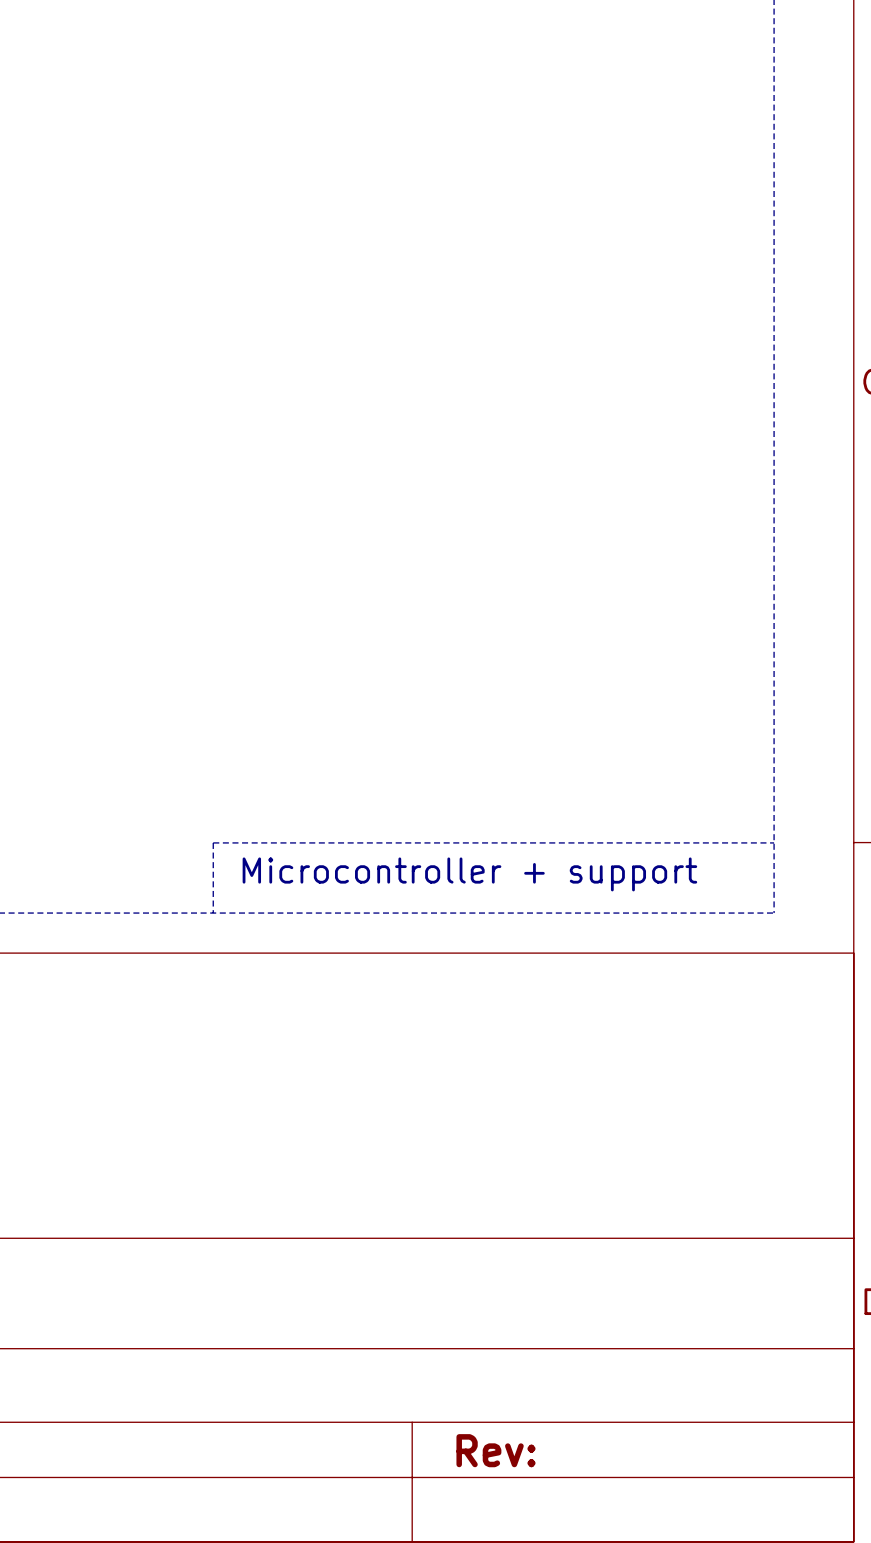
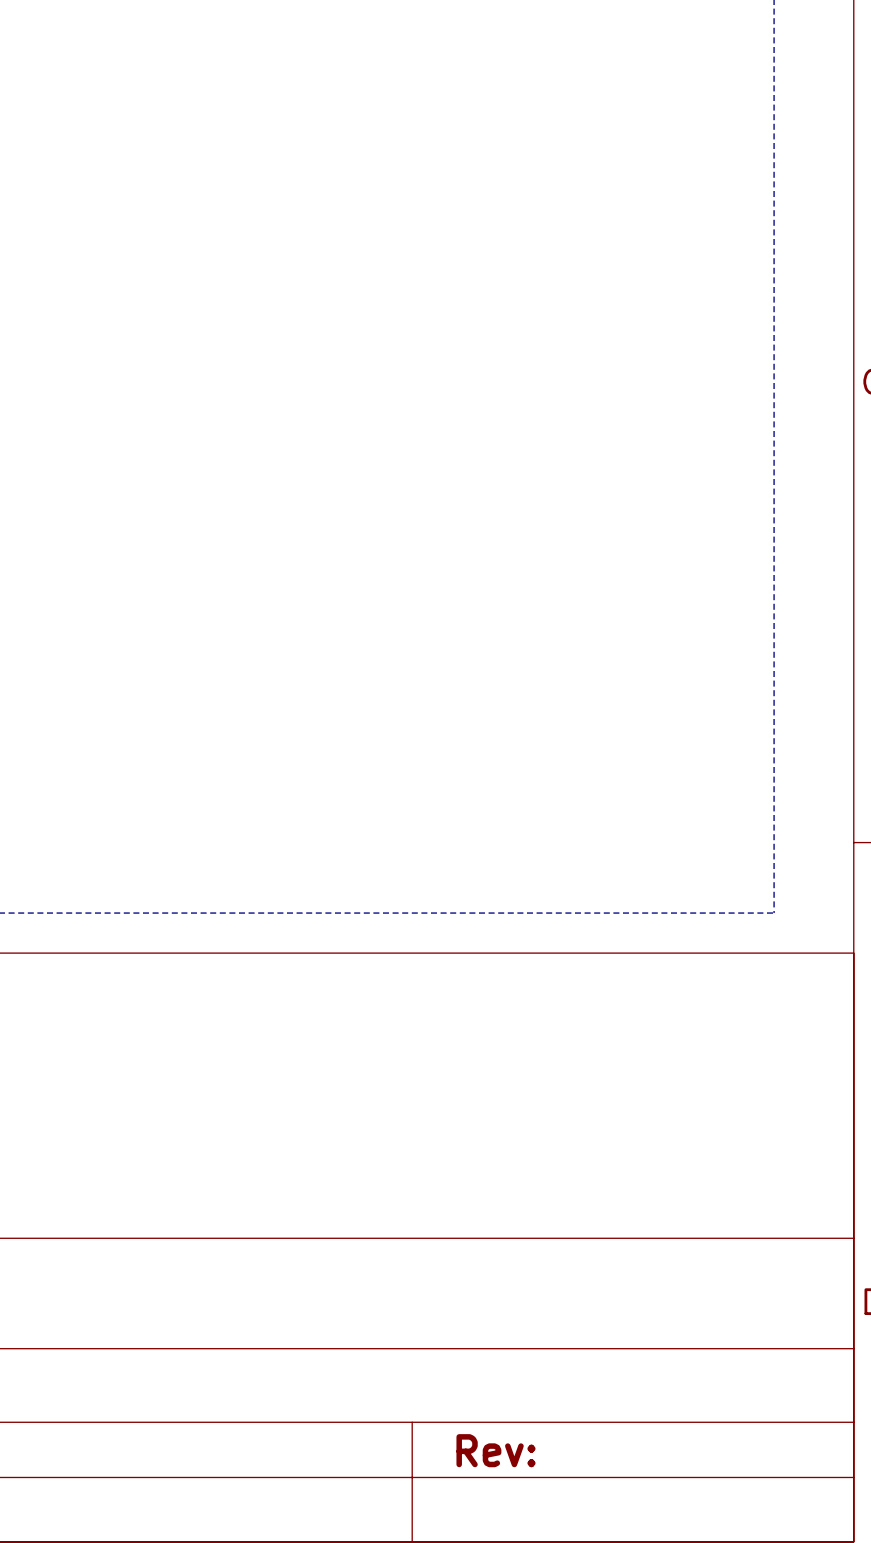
line: (774, 842) (213, 842) (213, 913) -> none
text: Microcontroller + support (469, 874) -> none

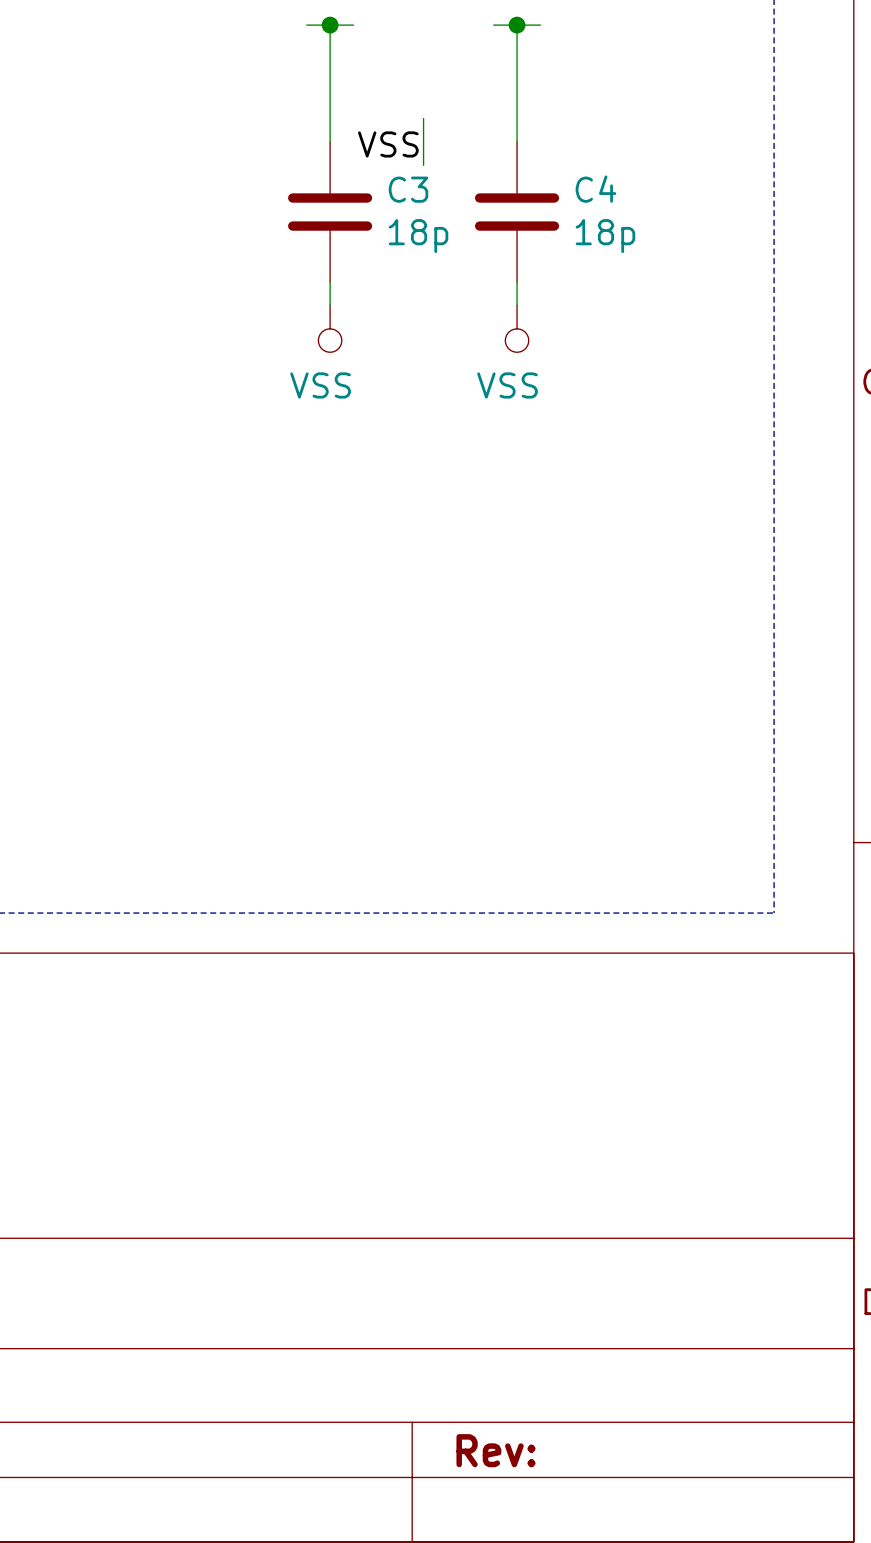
wire: none -> (306, 25) (353, 25)
wire: none -> (330, 25) (330, 141)
junction: none -> (330, 25)
wire: none -> (493, 25) (540, 25)
wire: none -> (517, 25) (517, 141)
junction: none -> (517, 25)
wire: none -> (423, 118) (423, 165)
label: none -> VSS (388, 144)
C3: none -> 18p (330, 212)
C4: none -> 18p (517, 212)
wire: none -> (330, 282) (330, 305)
wire: none -> (517, 282) (517, 305)
power symbol: none -> VSS (330, 328)
power symbol: none -> VSS (517, 328)

